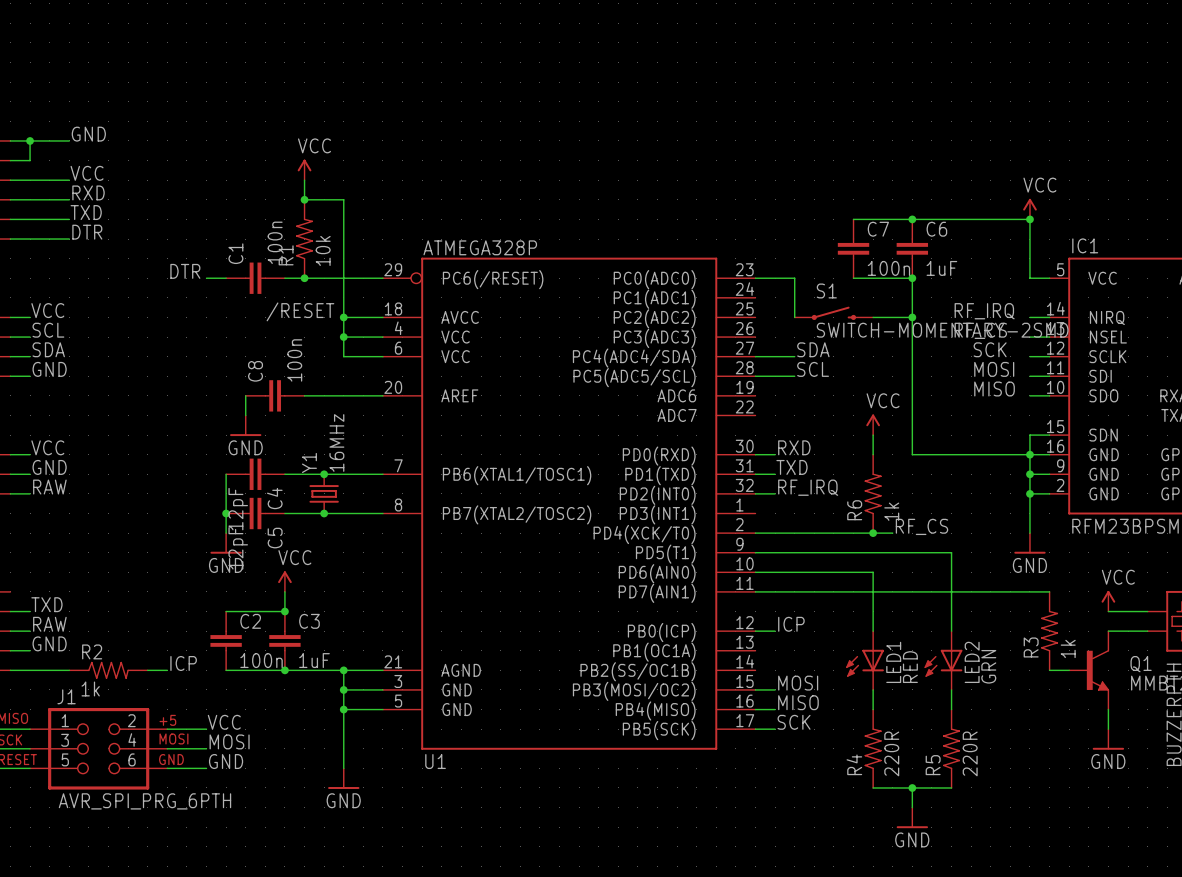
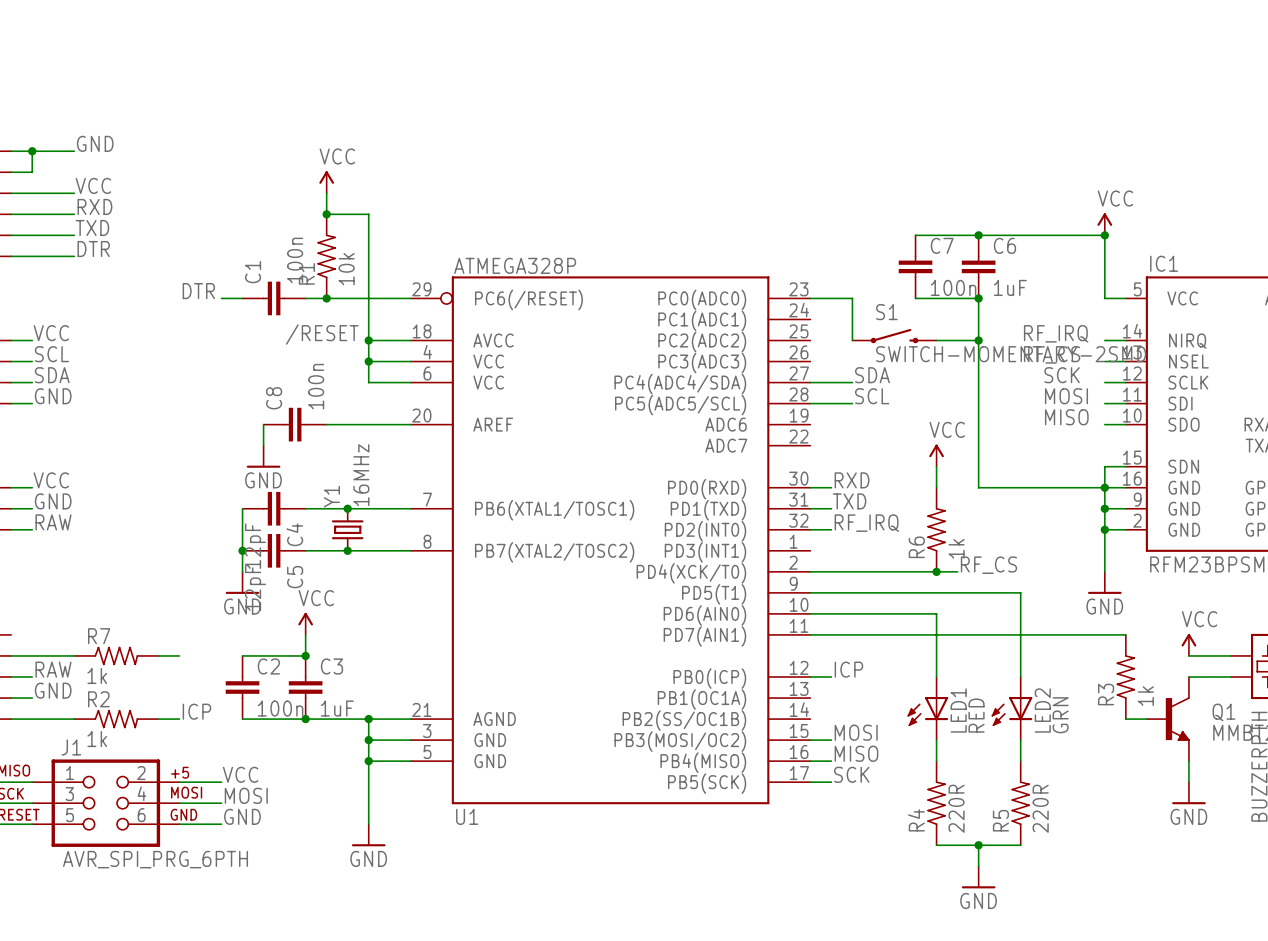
label: TXD (46, 604) -> none
wire: none -> (32, 655) (74, 655)
R7: none -> 1k (116, 655)
wire: none -> (158, 655) (179, 655)

